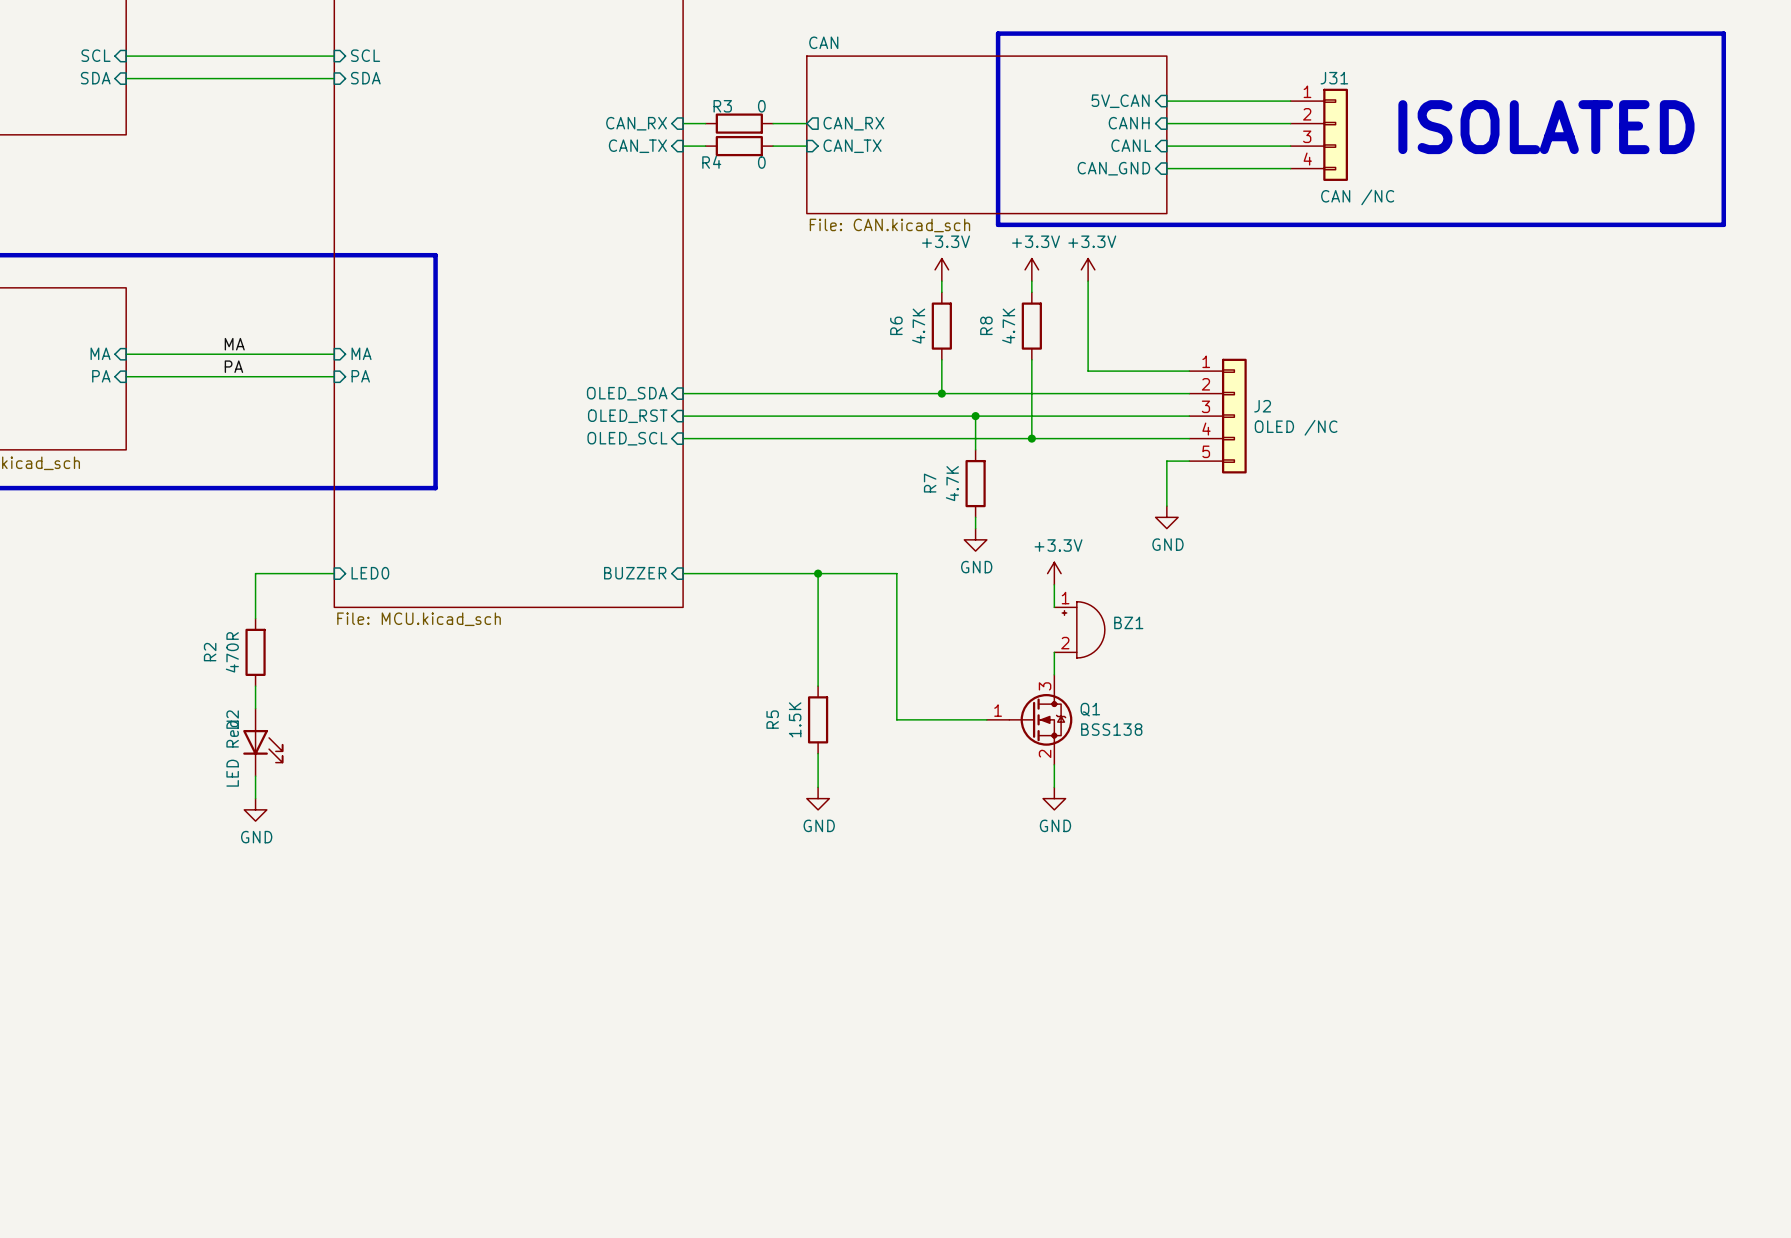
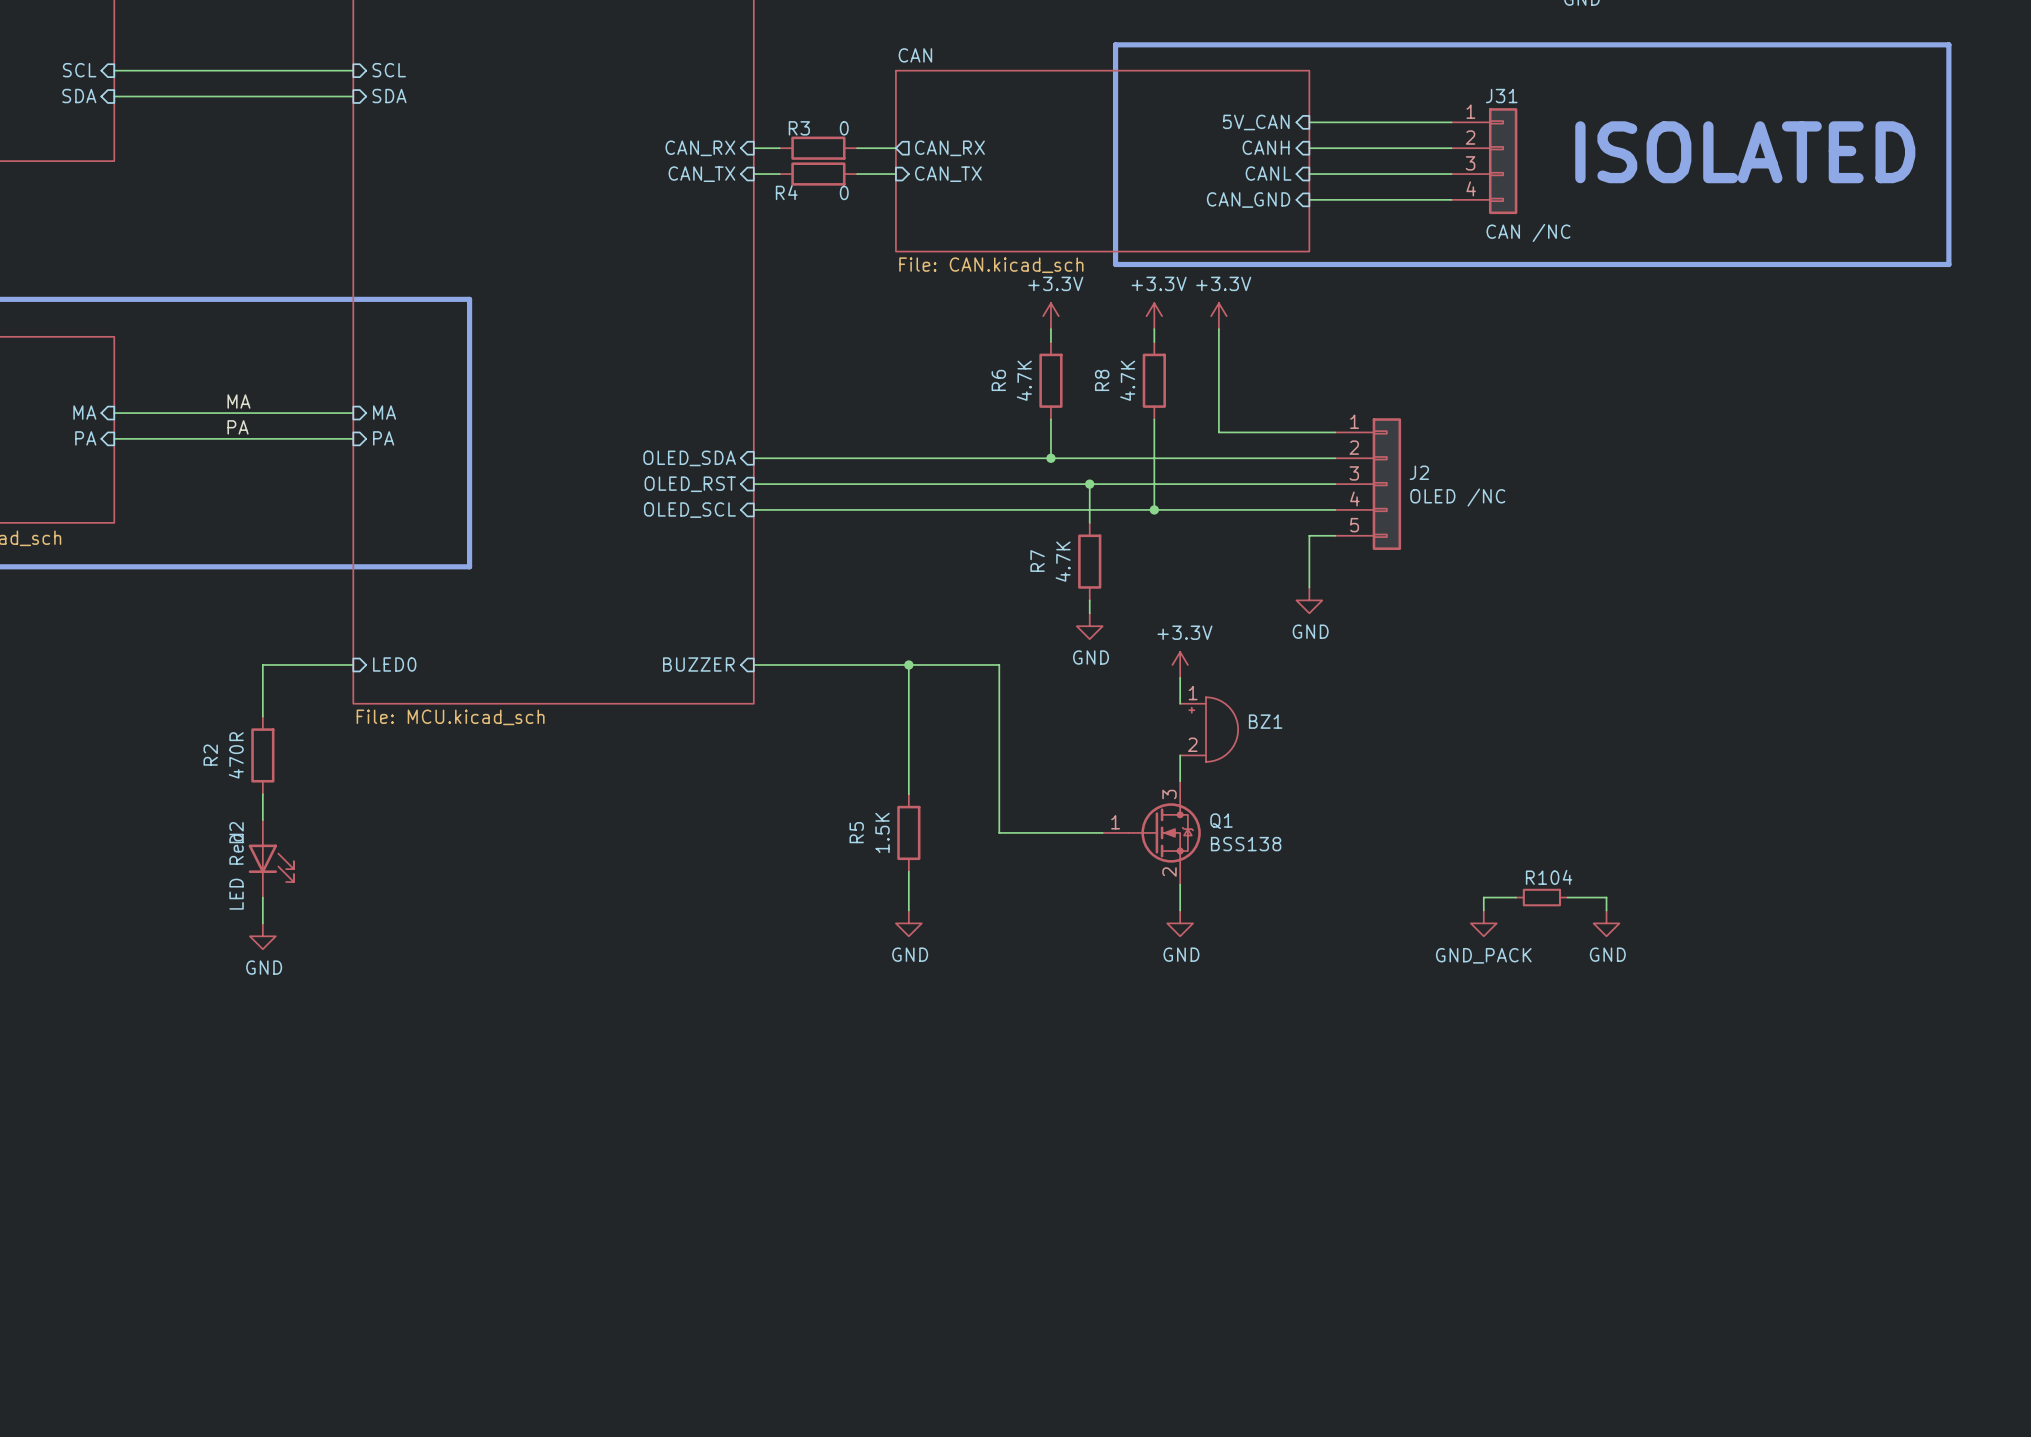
wire: none -> (1516, 897) (1483, 897) (1483, 910)
R104: none -> (1541, 897)
wire: none -> (1567, 897) (1606, 897) (1606, 910)
power symbol: none -> GND_PACK (1483, 923)
power symbol: none -> GND (1606, 923)

